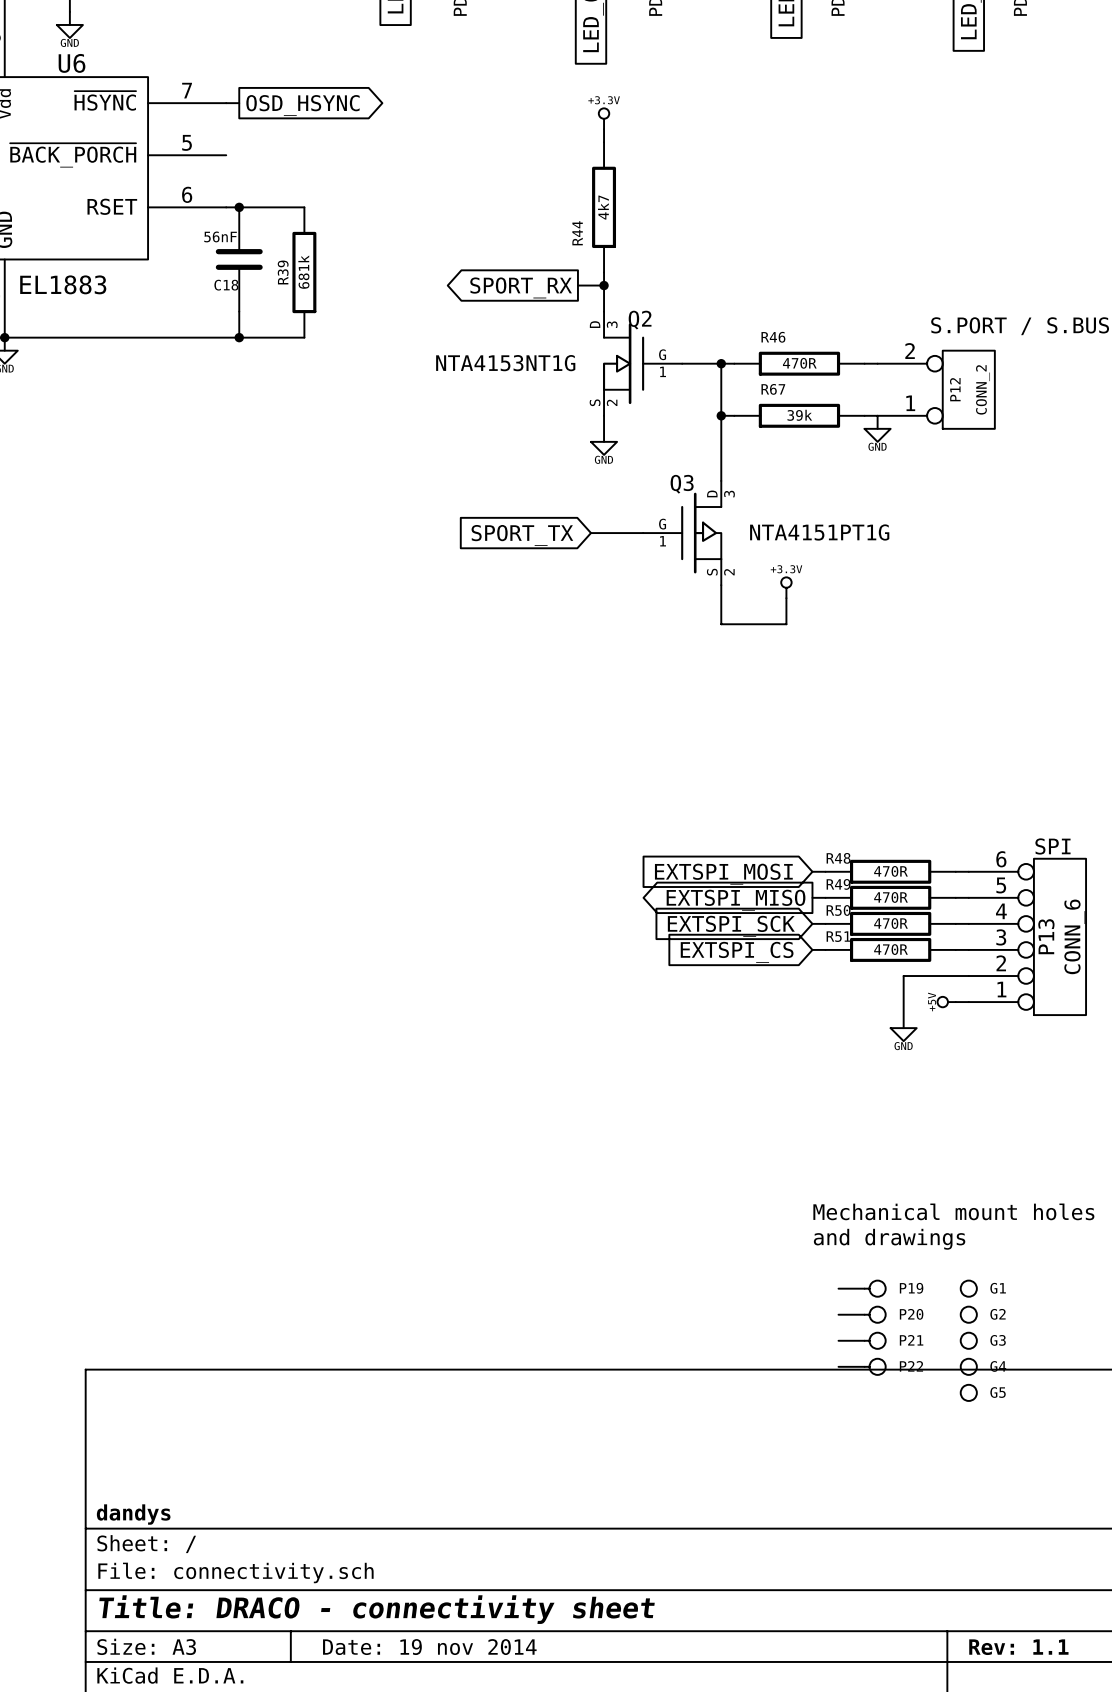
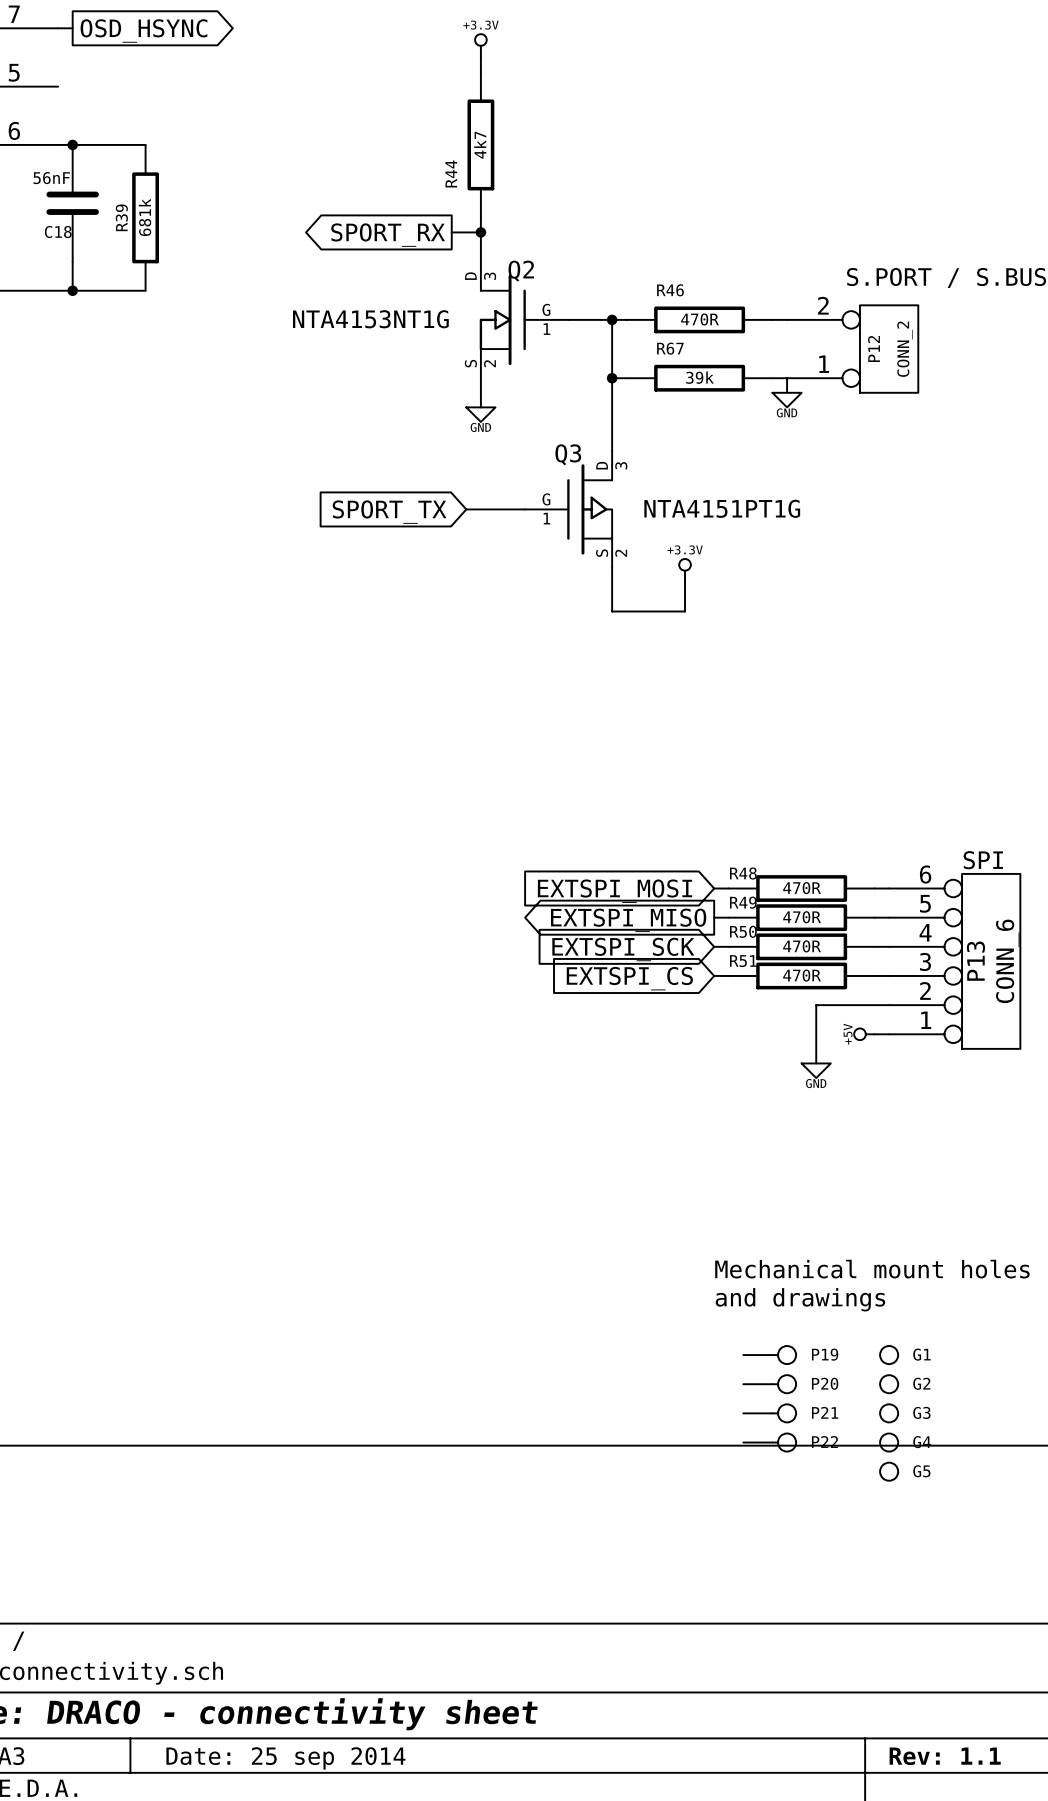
title block: Date: 19 nov 2014 (429, 1647) -> Date: 25 sep 2014 (285, 1758)

